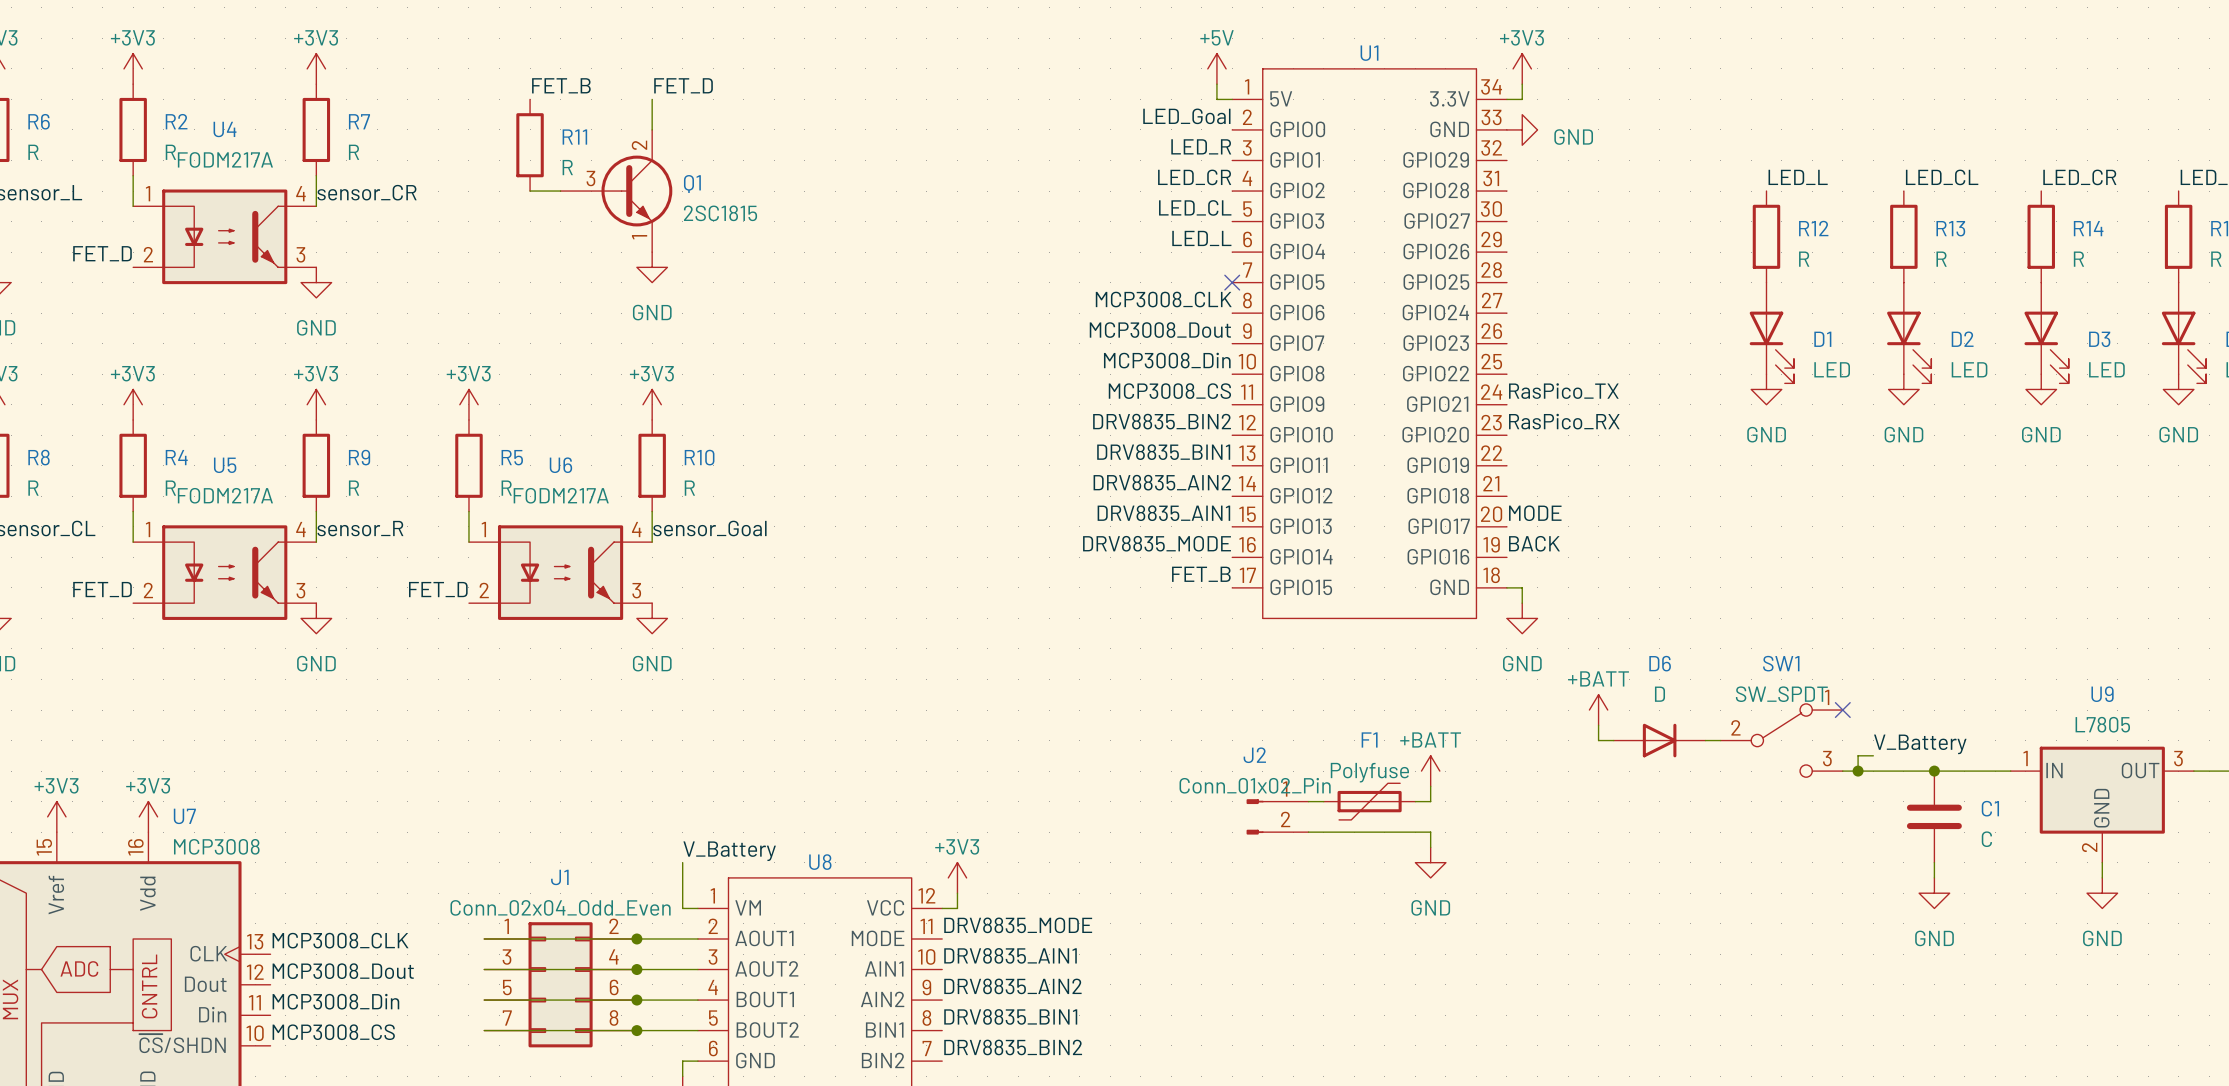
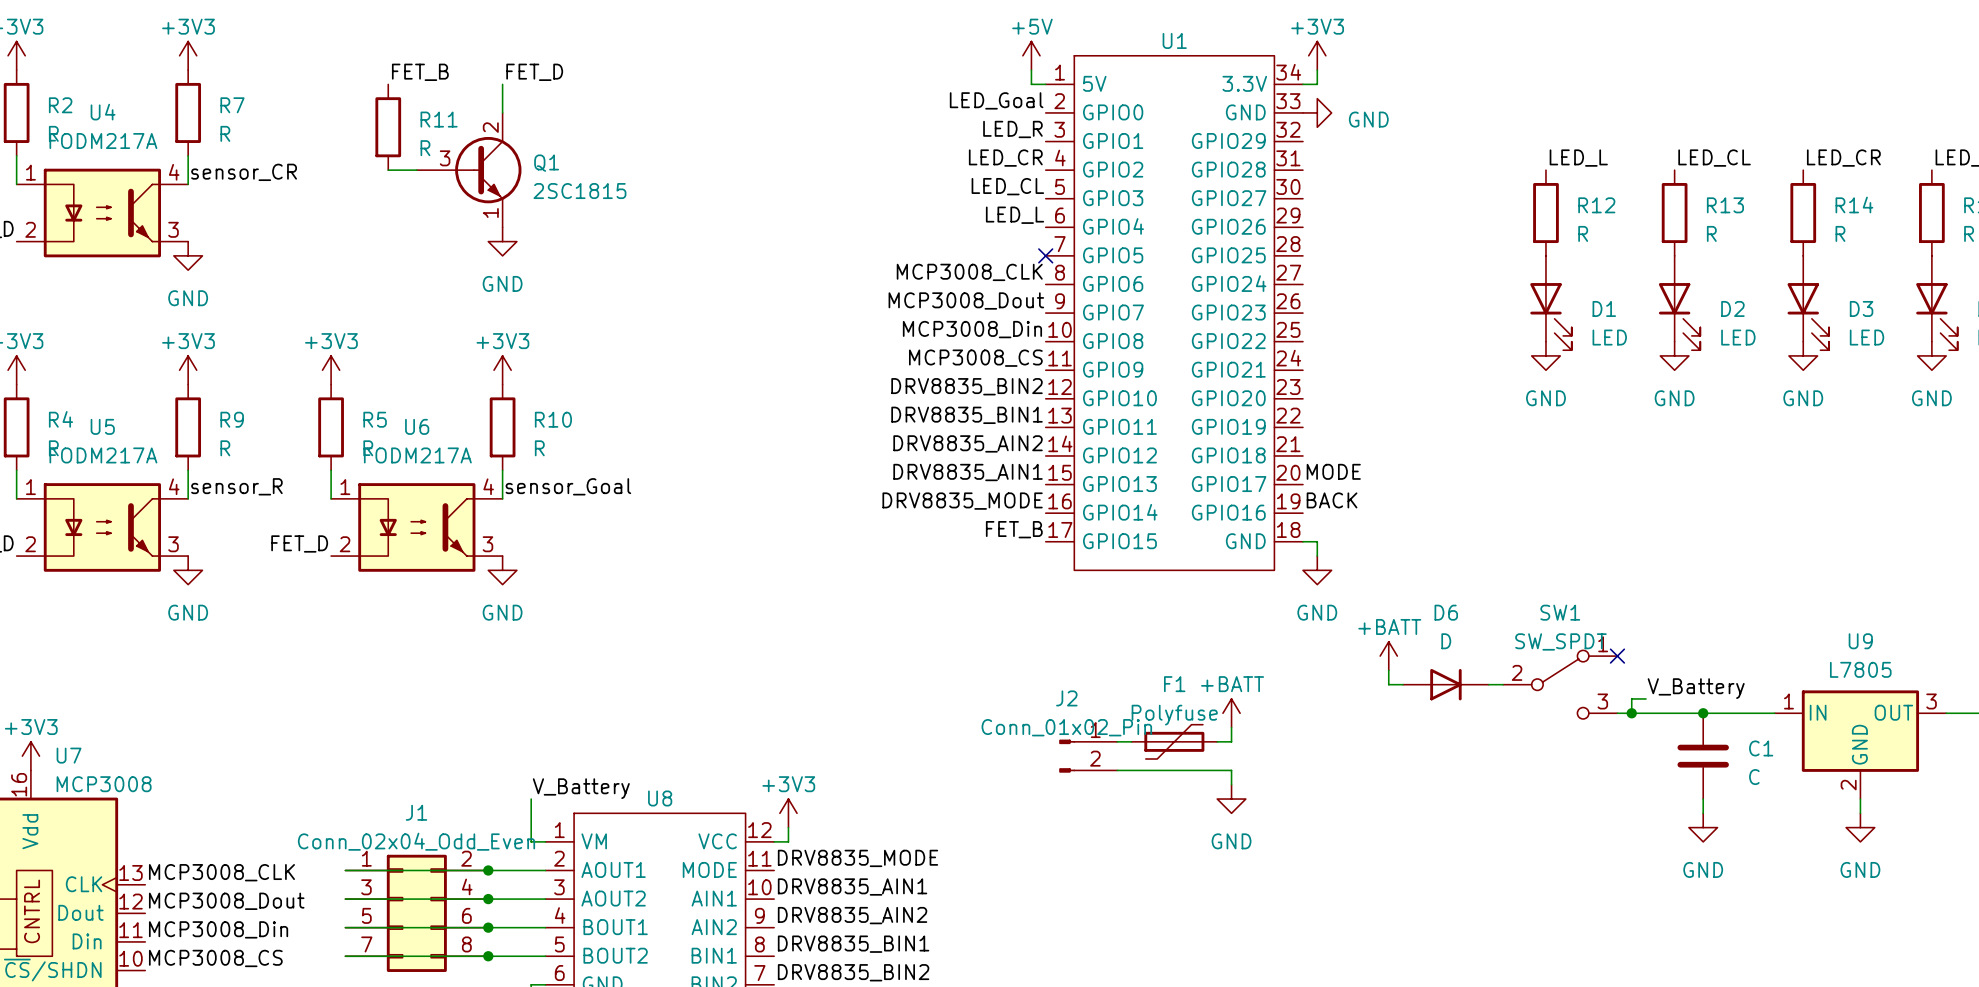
label: RasPico_TX (1563, 391) -> none
label: RasPico_RX (1564, 421) -> none

